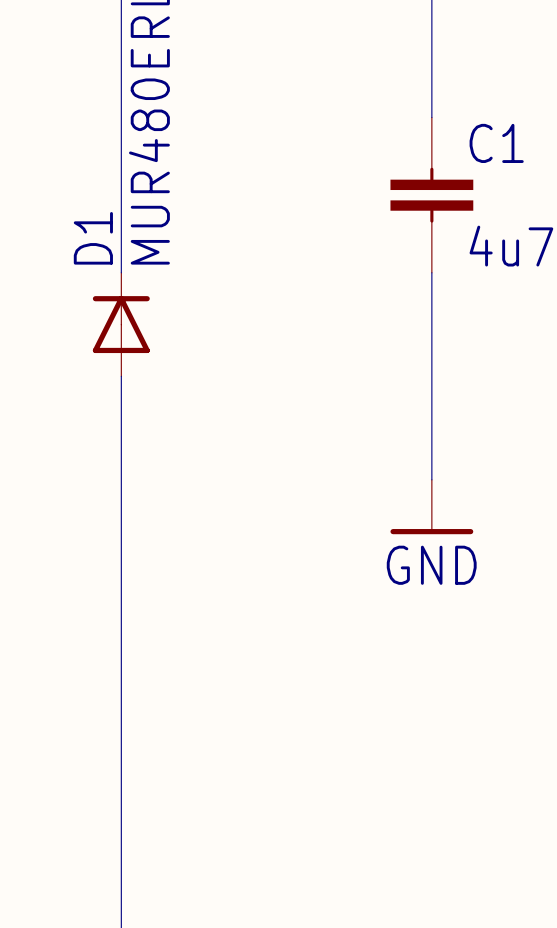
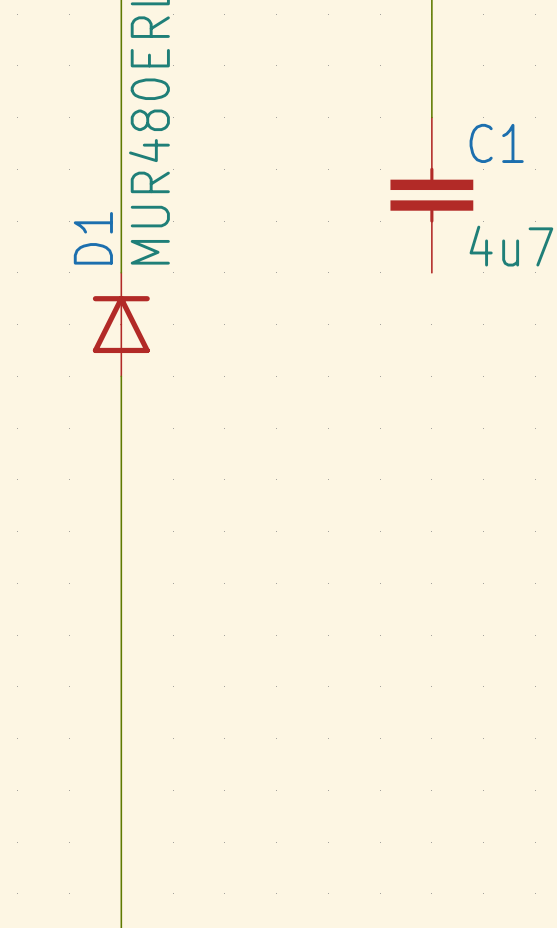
wire: (431, 272) (431, 479) -> none
power symbol: GND (431, 507) -> none

